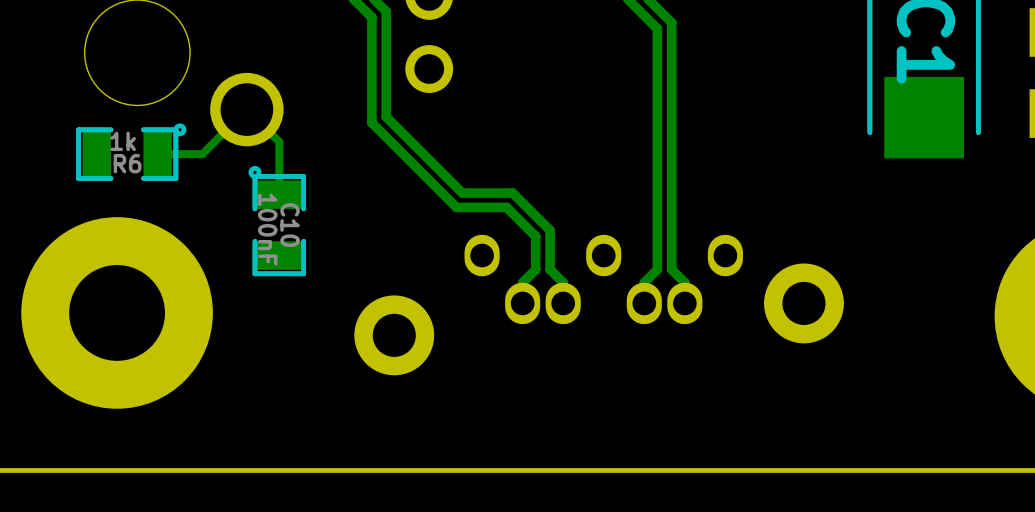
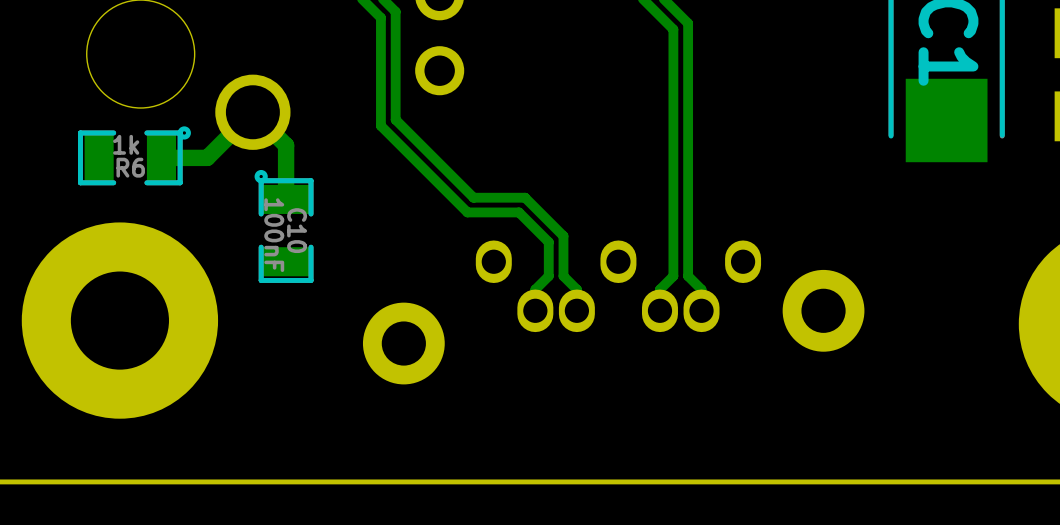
bottom track width: thin (157, 154) (202, 154) (246, 109) (279, 142) (279, 194) -> thick (161, 157) (207, 157) (252, 112) (286, 145) (286, 199)

